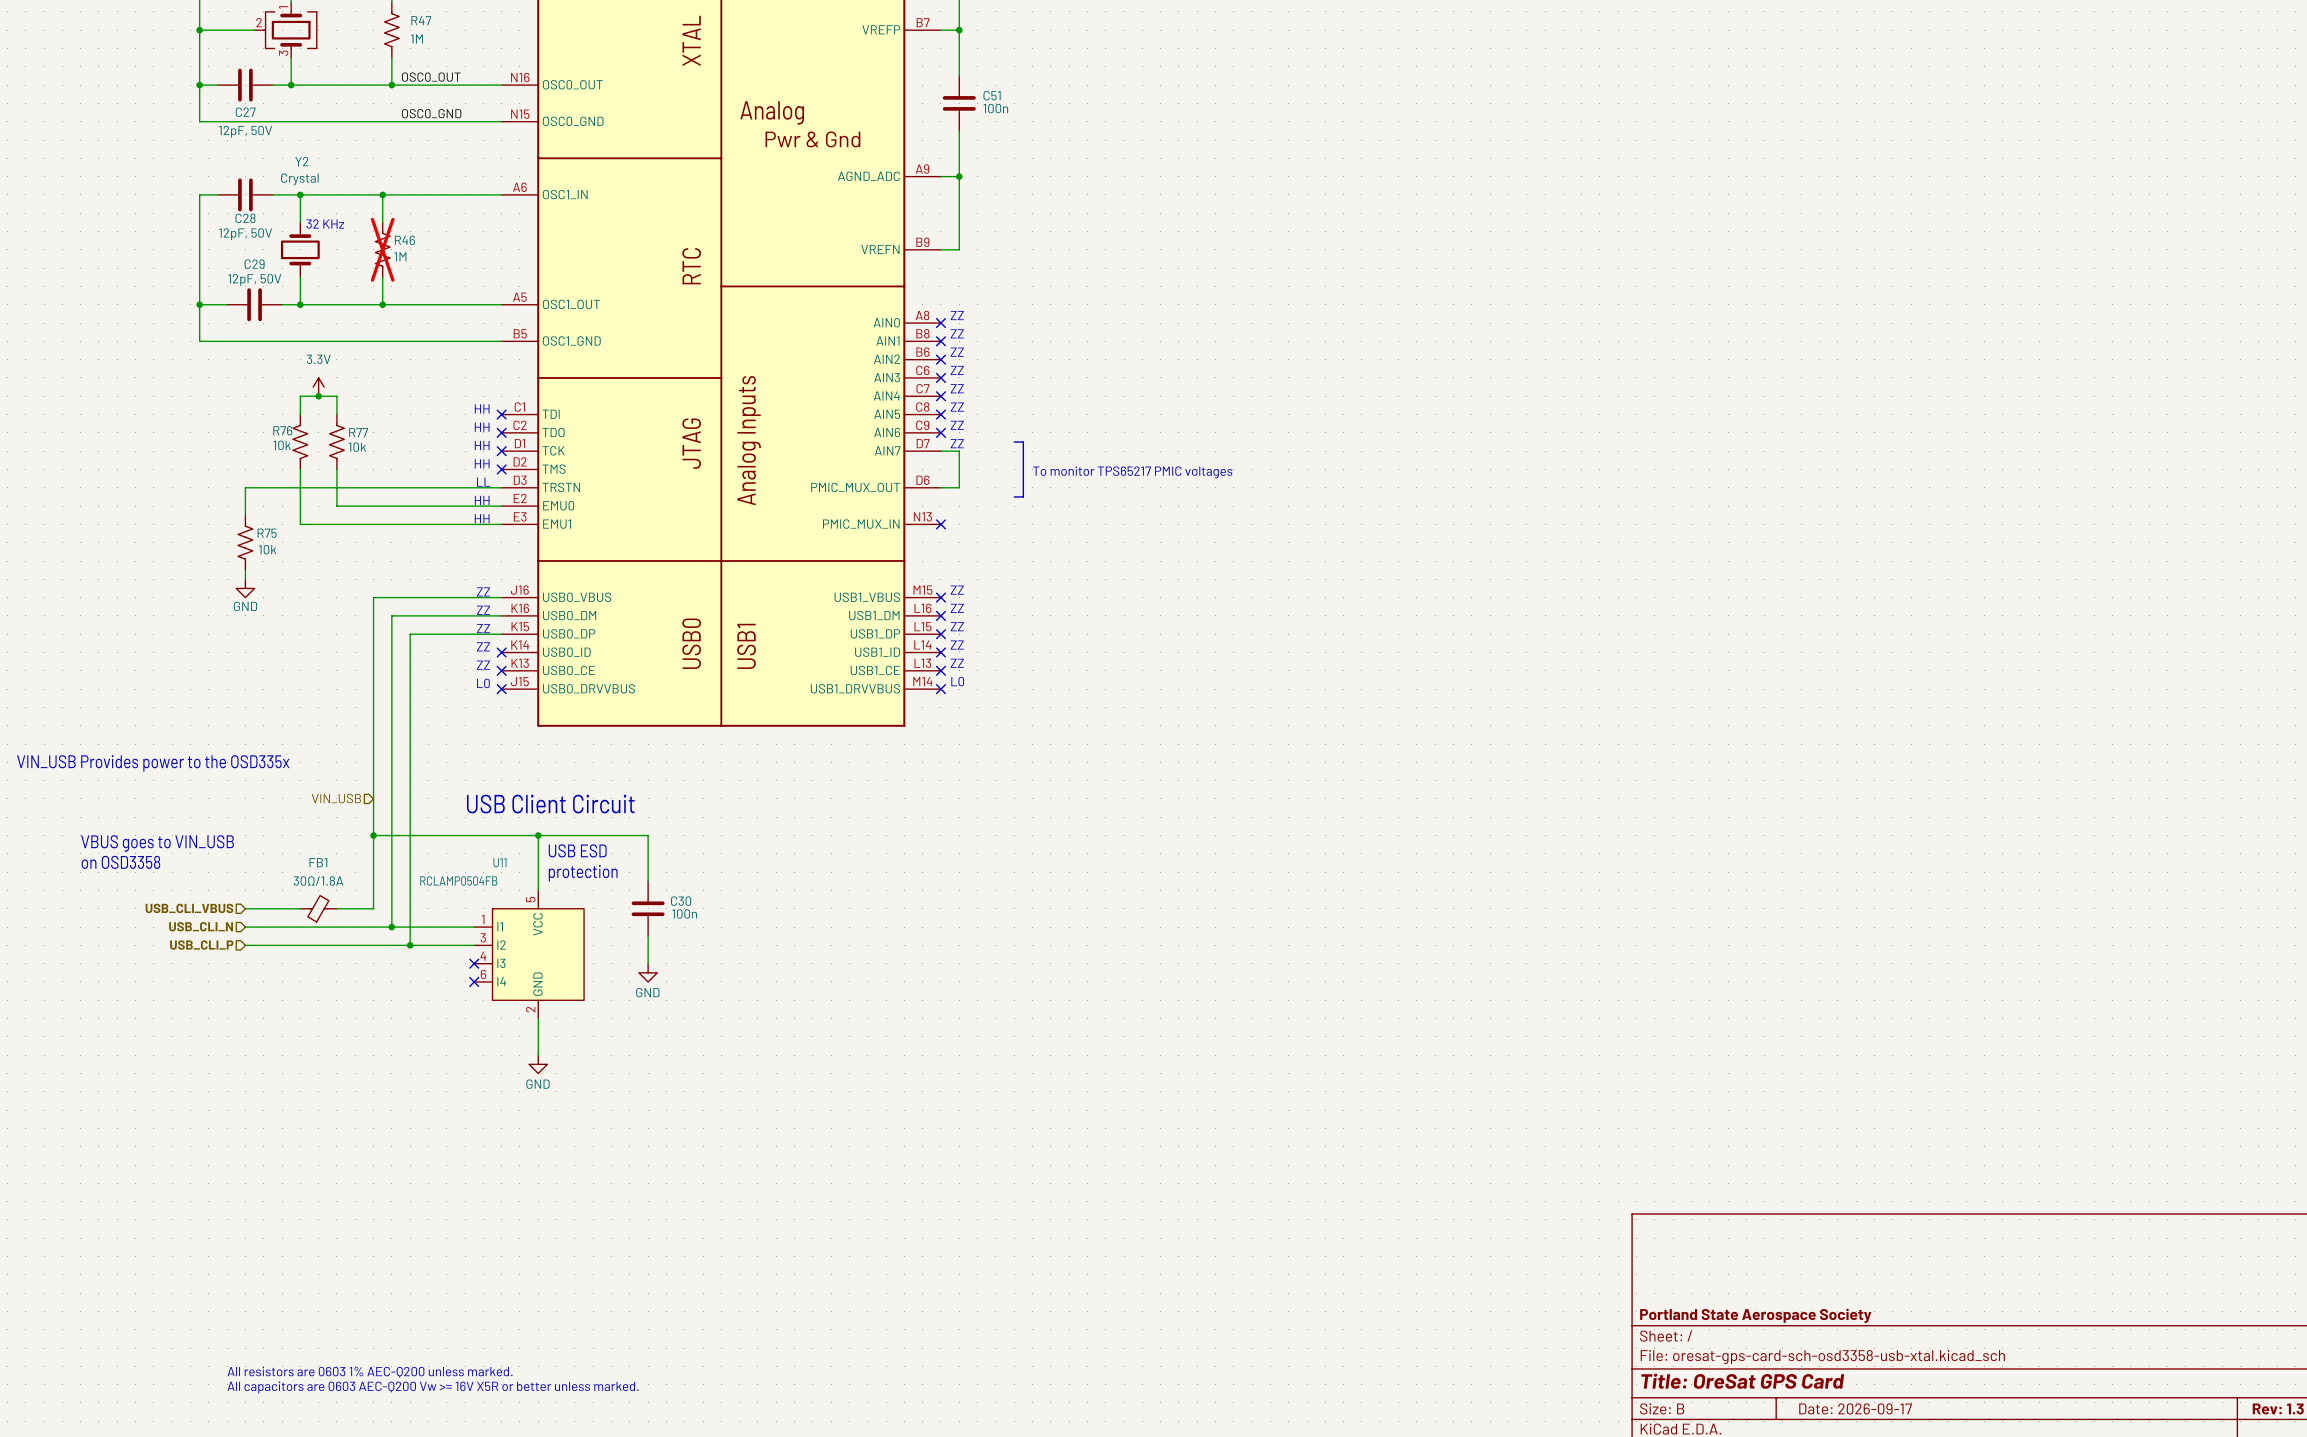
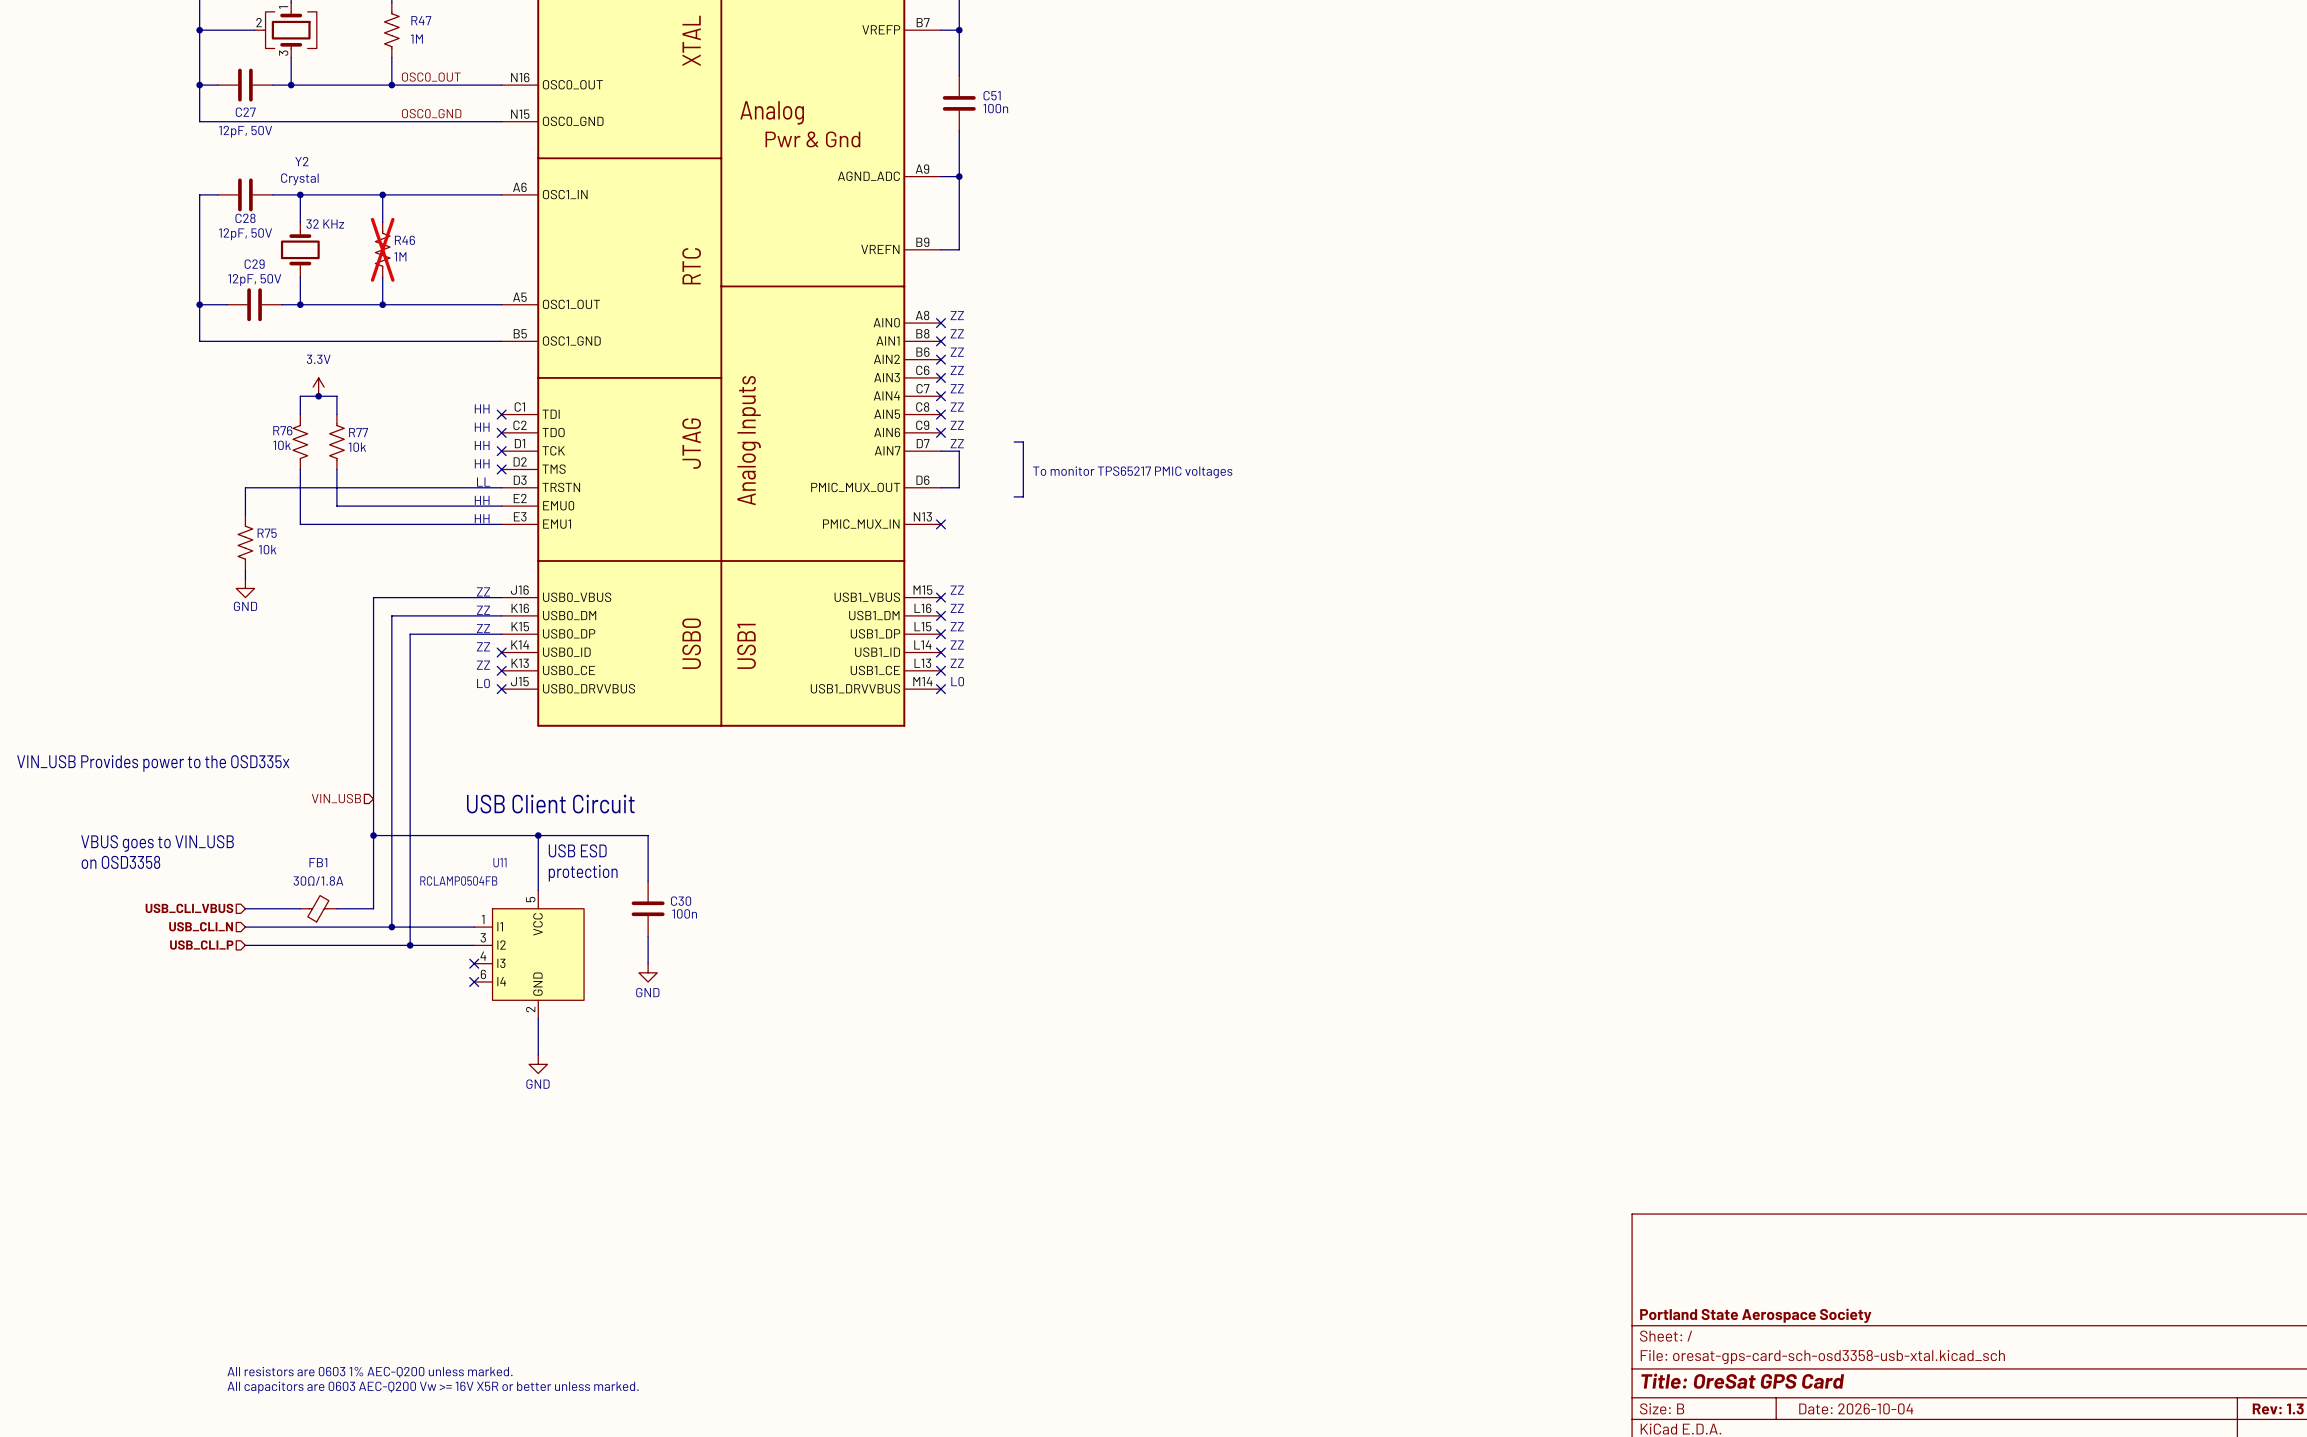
title block: Date: 2026-09-17 (1855, 1408) -> Date: 2026-10-04 (1856, 1408)

